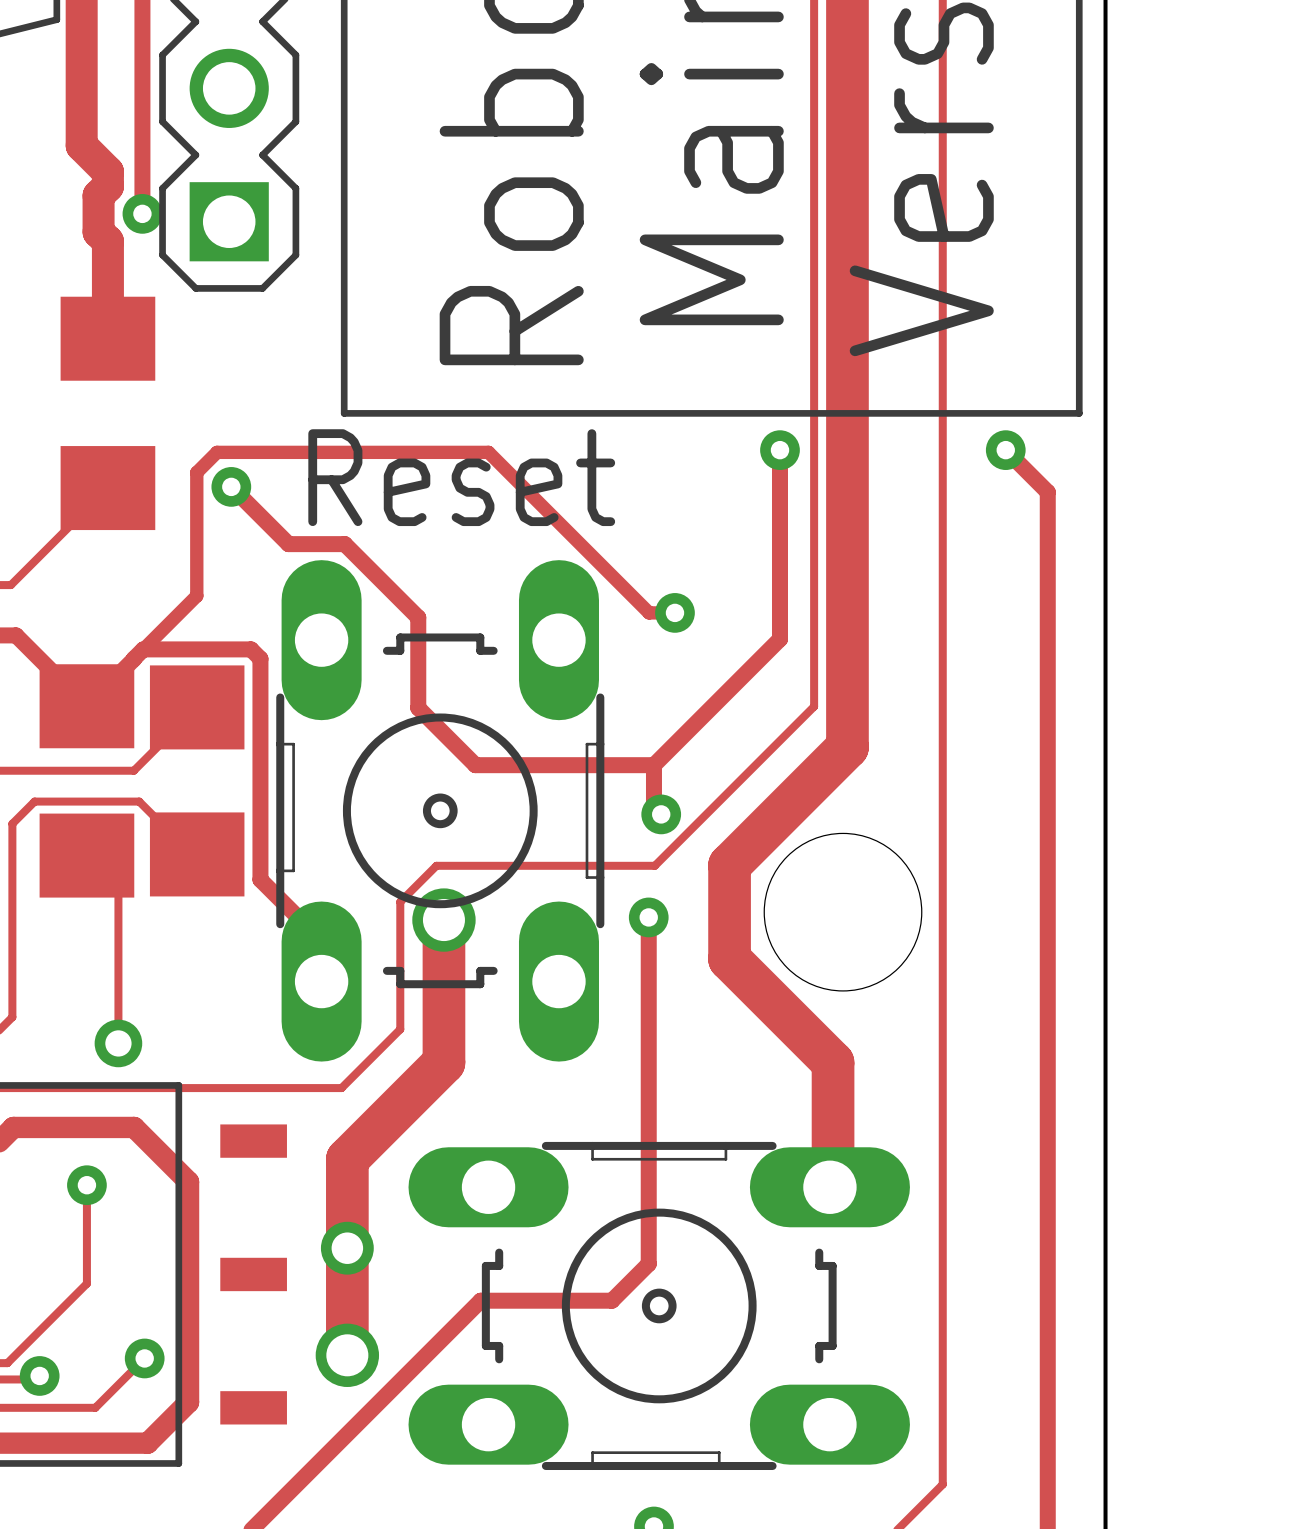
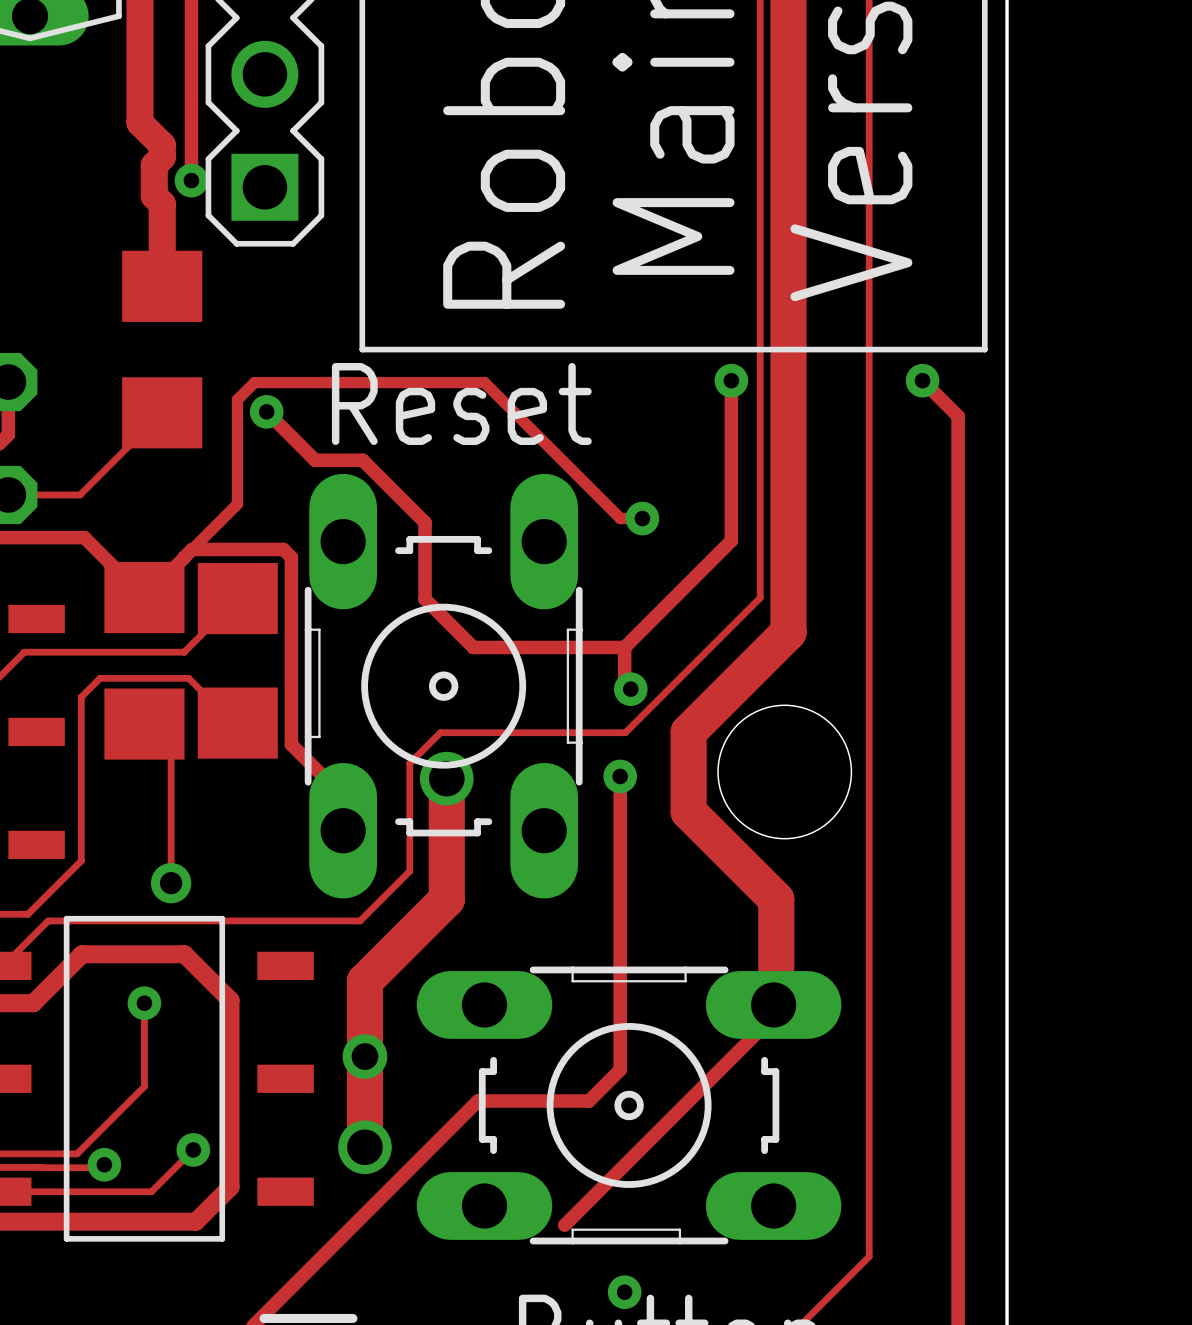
track: none -> (776, 1002) (776, 1013) (564, 1225)

